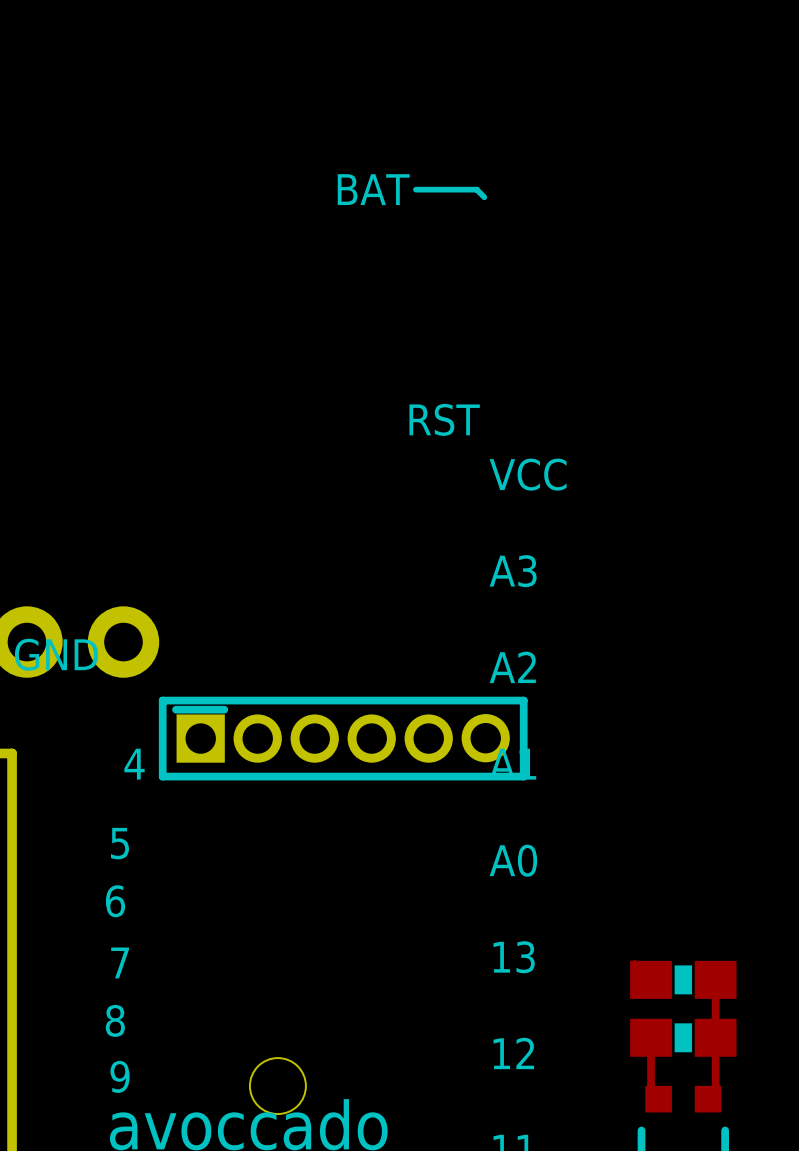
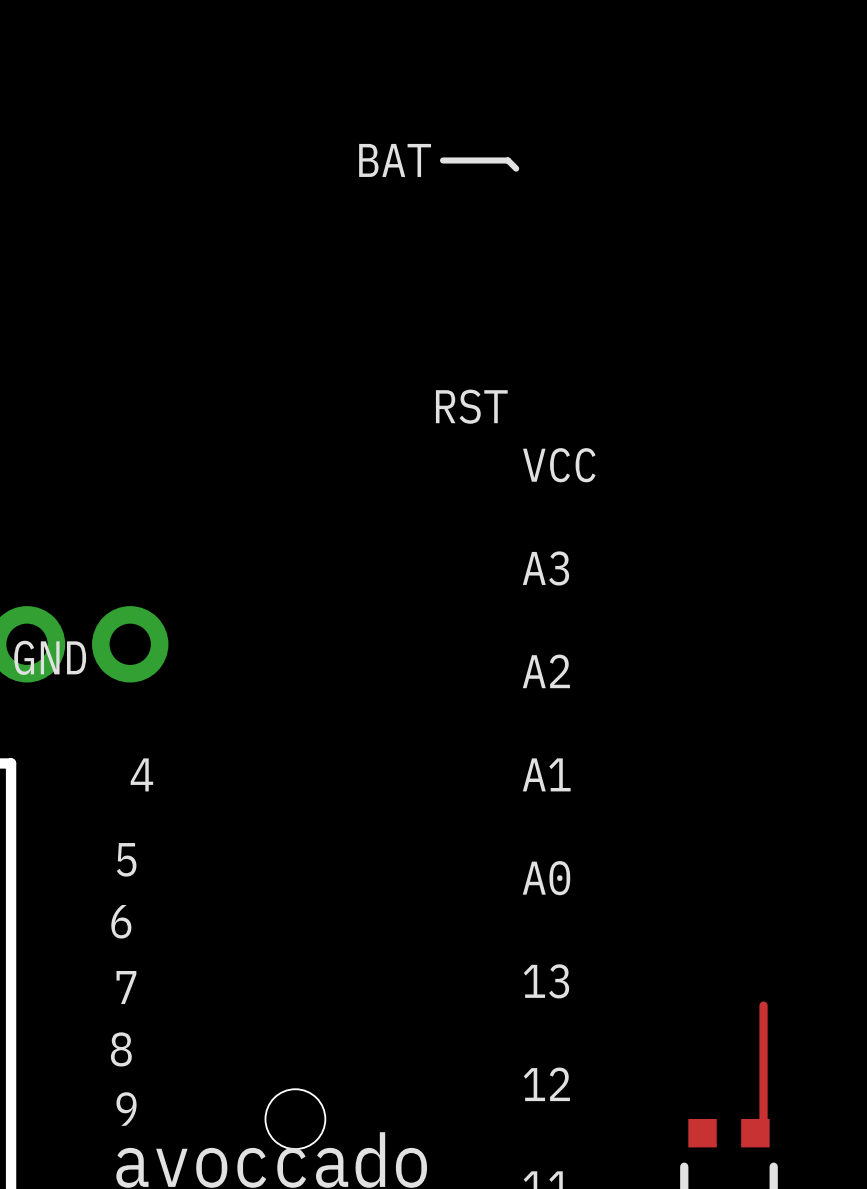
part: (343, 738) -> none
part: (683, 979) -> none
top track: (651, 1037) (651, 1091) (658, 1099) -> none
part: (683, 1037) -> none

